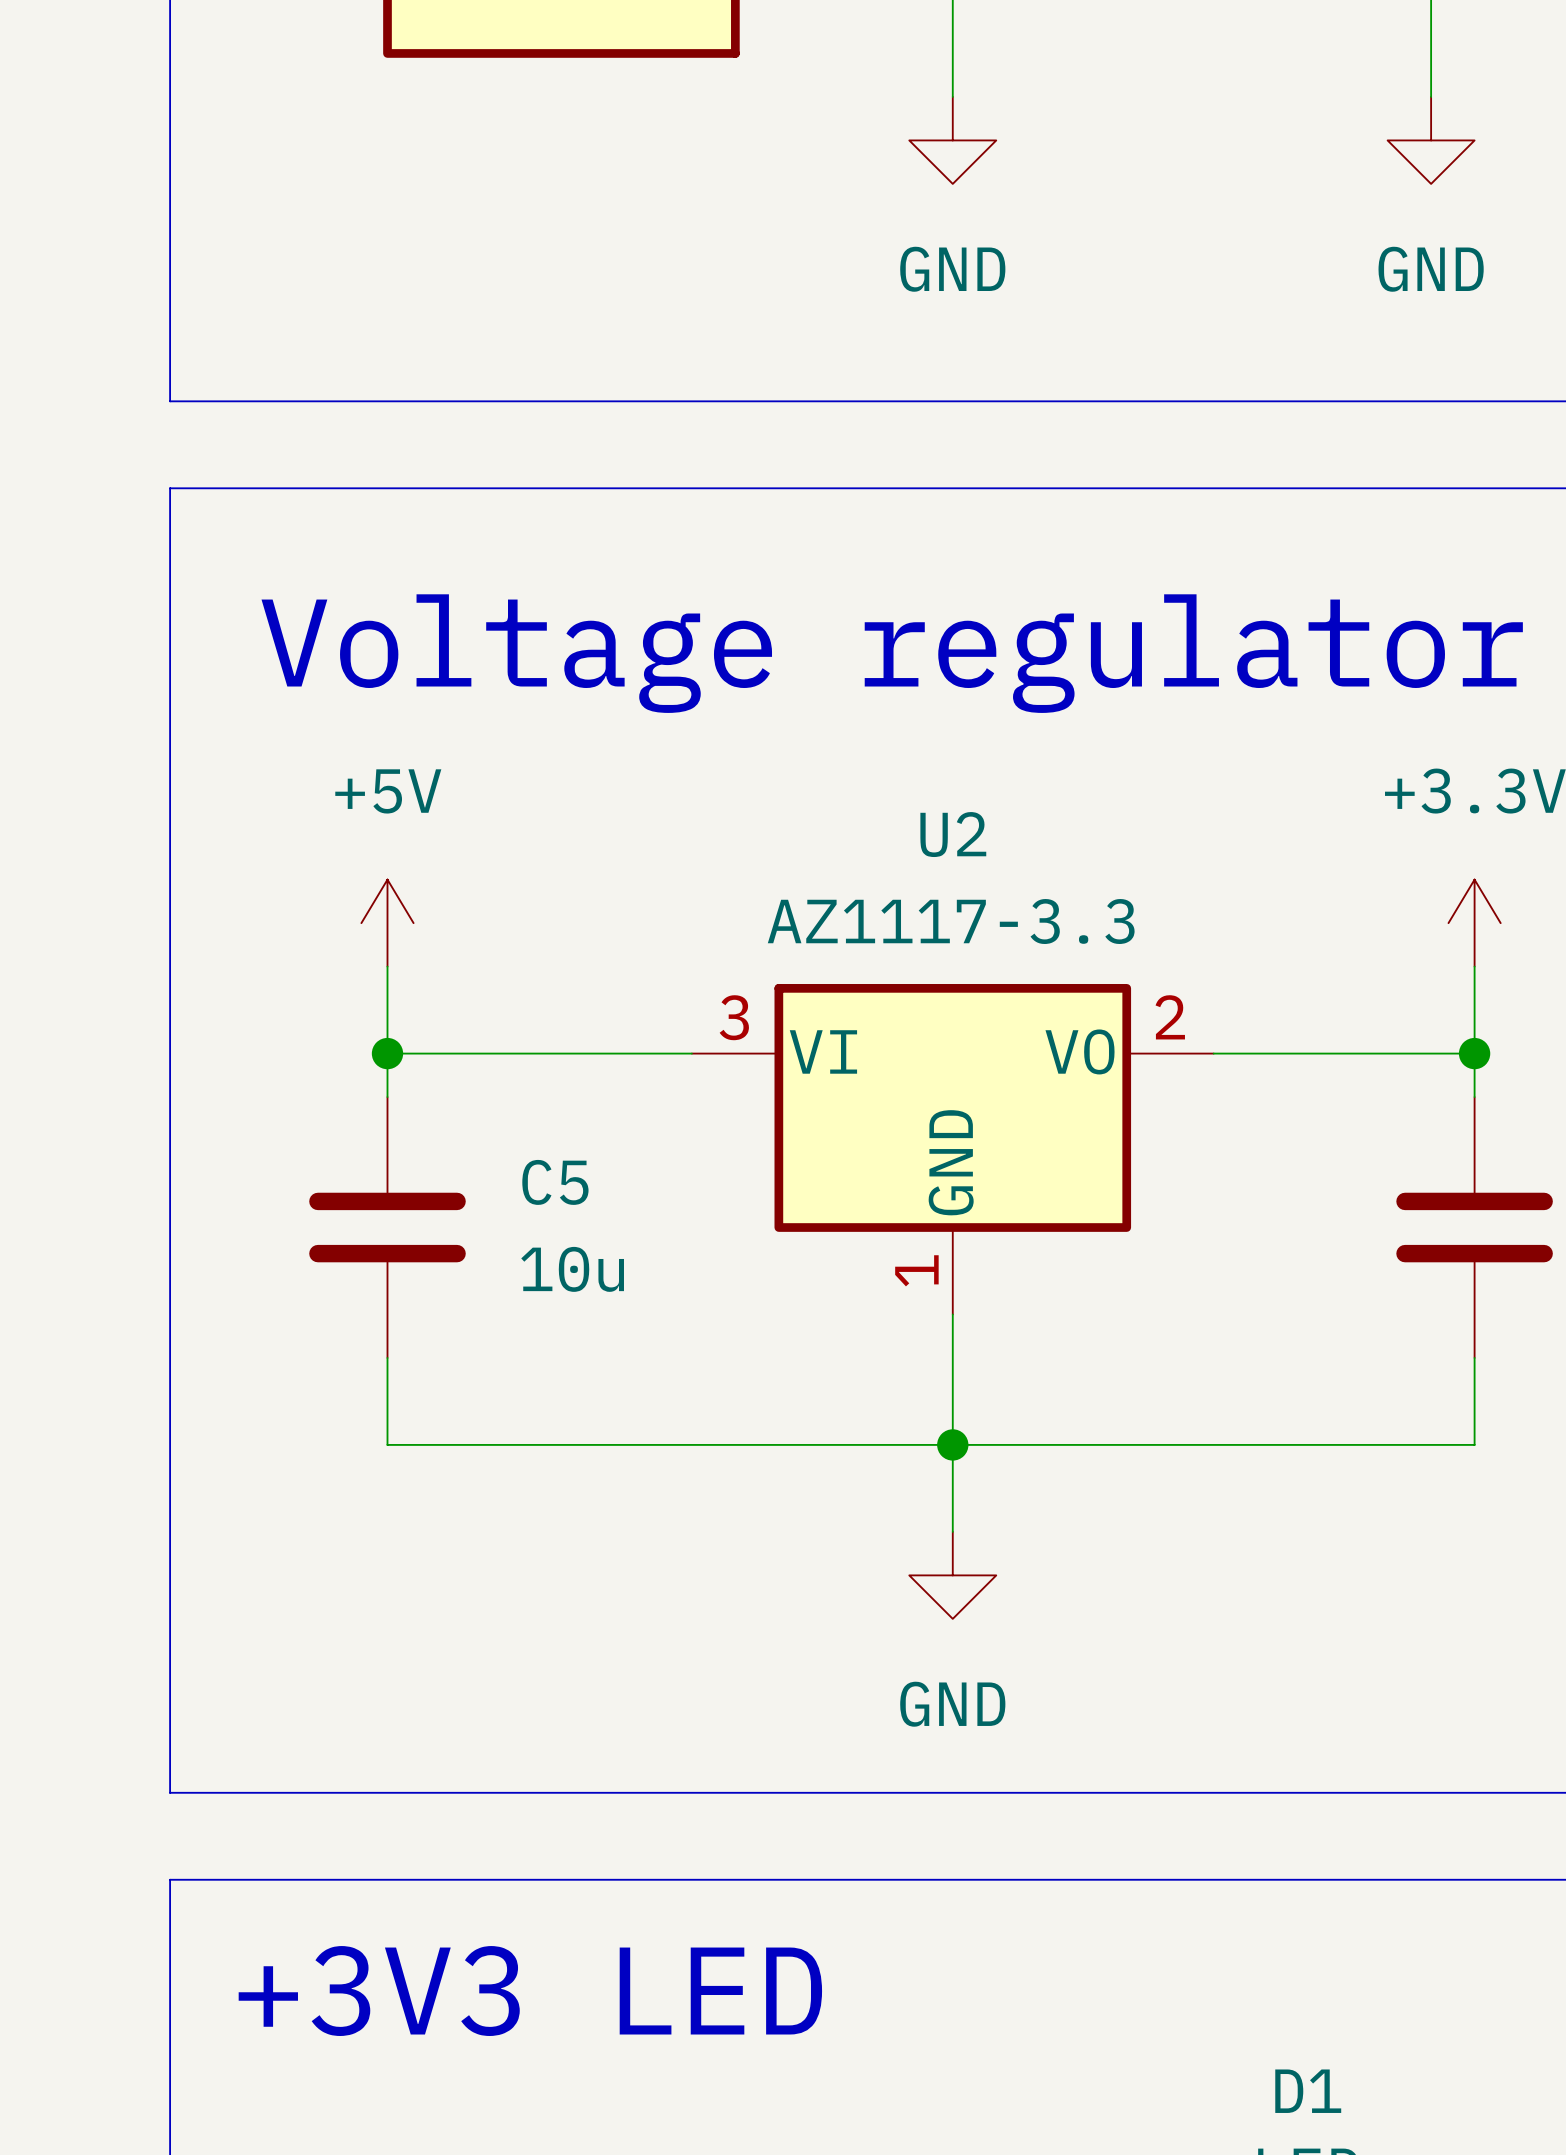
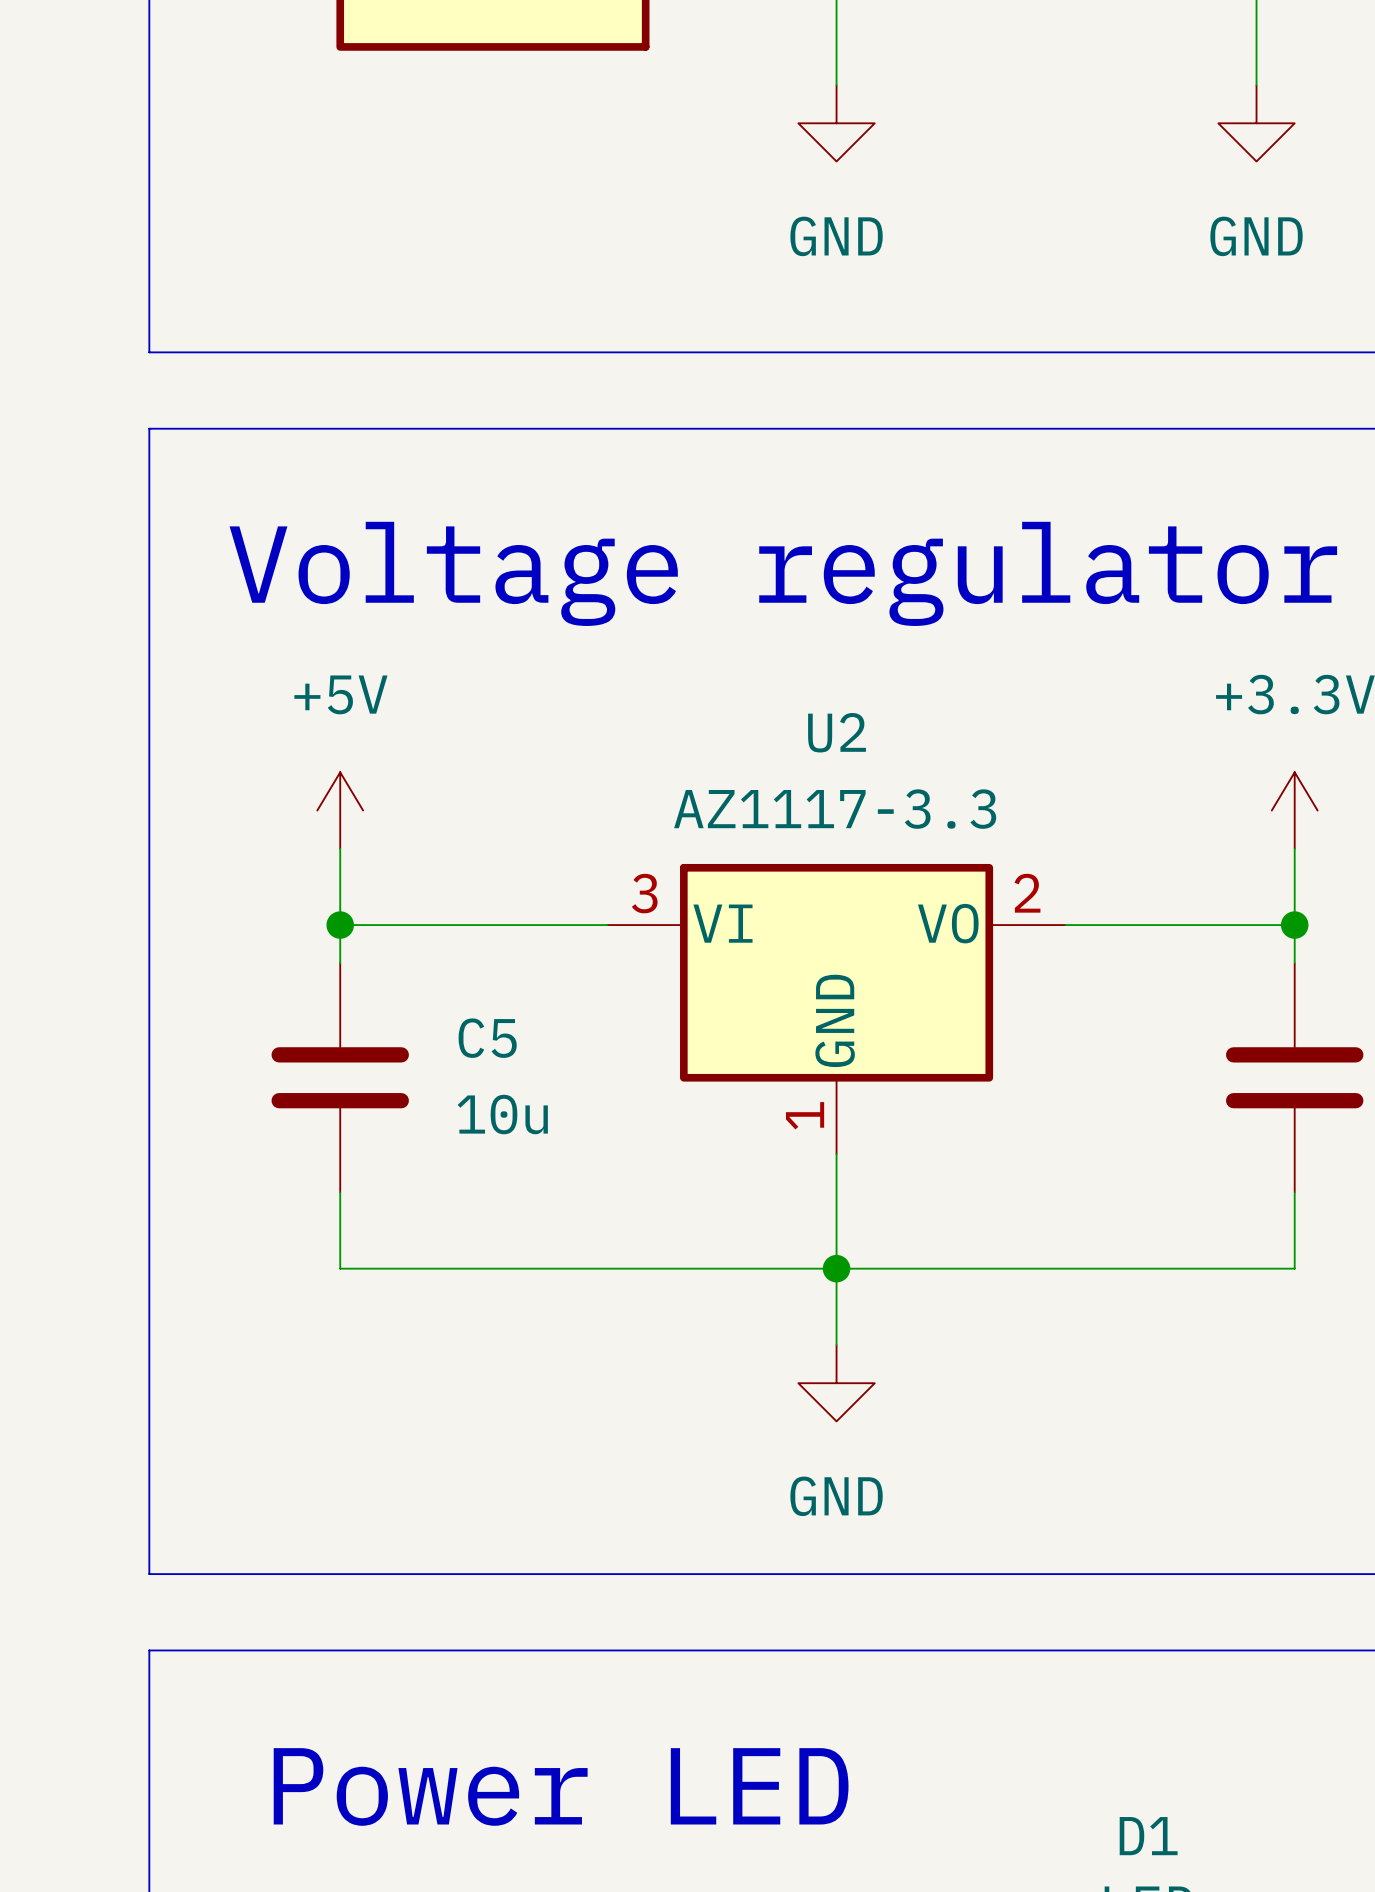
text: +3V3 LED (530, 1991) -> none
text: none -> Power LED (561, 1786)

